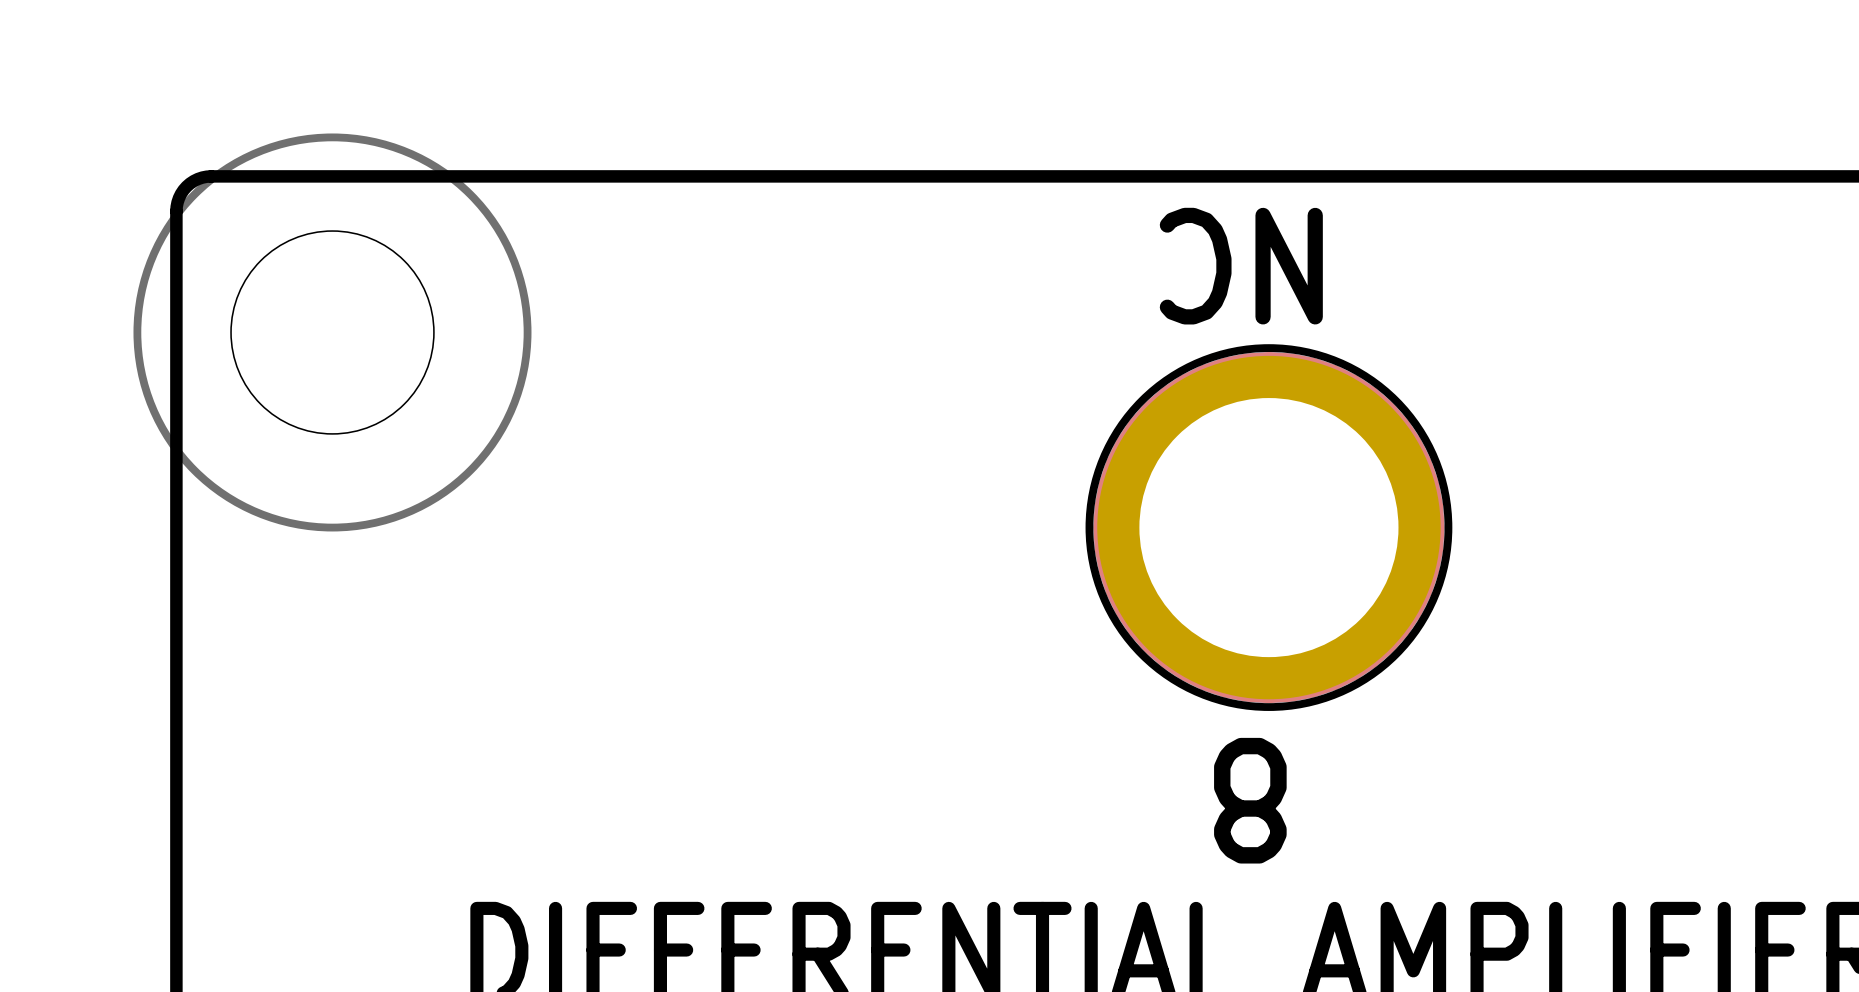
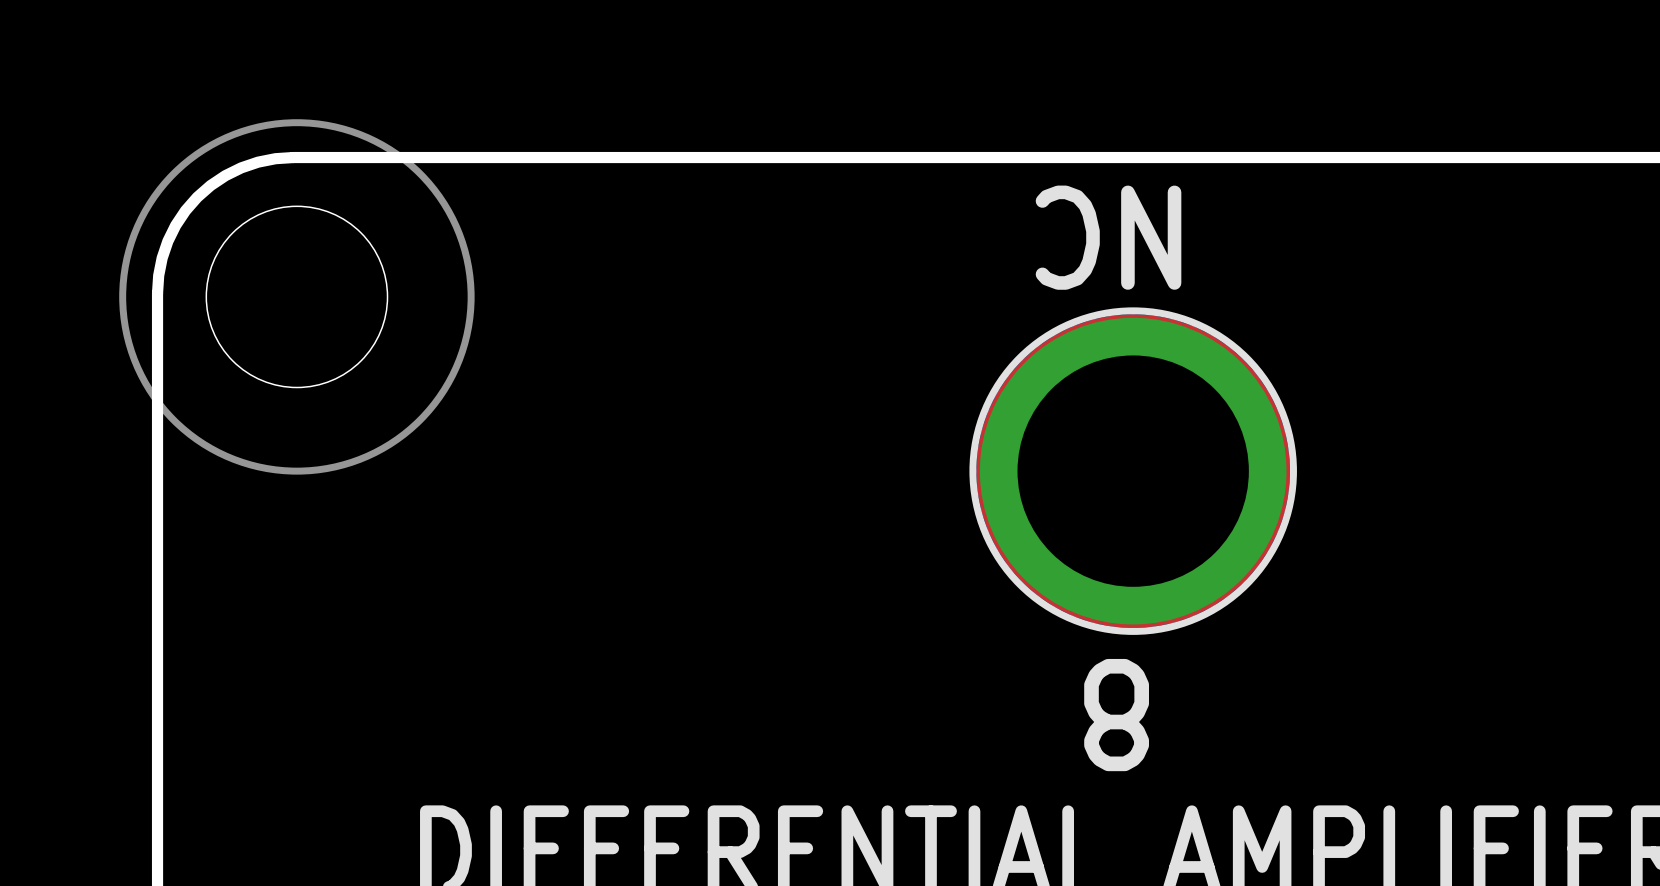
board edge: (328, 176) (206, 176) (197, 179) (186, 186) (179, 197) (176, 206) (176, 328) -> (293, 157) (275, 158) (241, 167) (210, 185) (197, 197) (185, 210) (167, 241) (158, 275) (157, 293)

